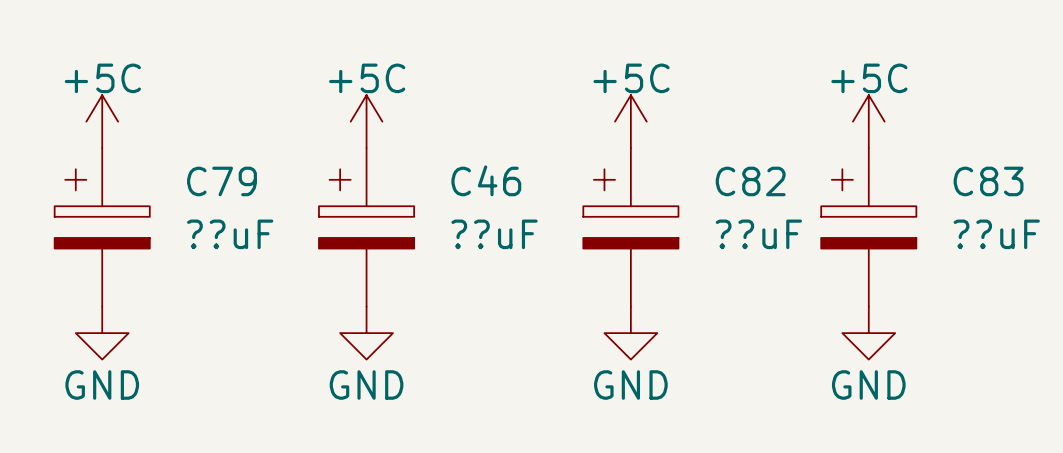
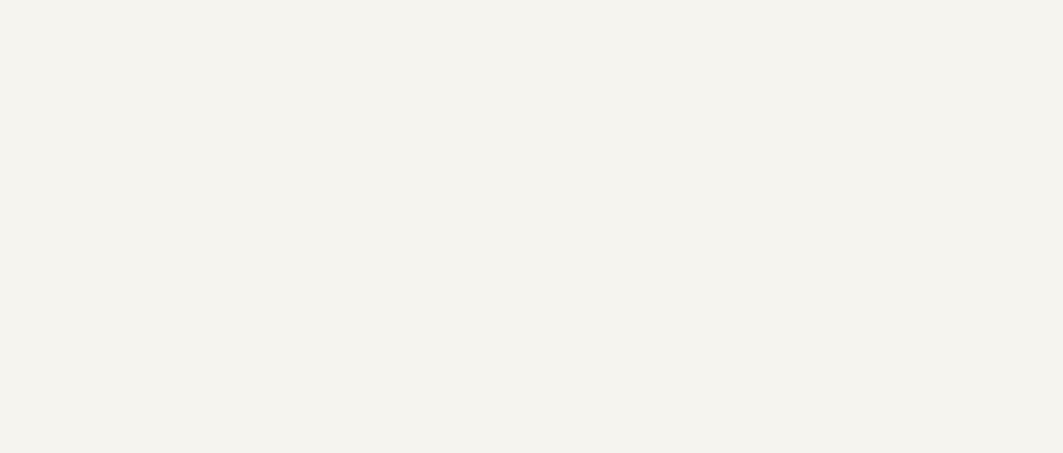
power symbol: +5C (102, 121) -> none
power symbol: +5C (366, 121) -> none
power symbol: +5C (630, 121) -> none
power symbol: +5C (868, 121) -> none
C79: ??uF (102, 227) -> none
C46: ??uF (366, 227) -> none
C82: ??uF (630, 227) -> none
C83: ??uF (868, 227) -> none
power symbol: GND (102, 333) -> none
power symbol: GND (366, 333) -> none
power symbol: GND (630, 333) -> none
power symbol: GND (868, 333) -> none

